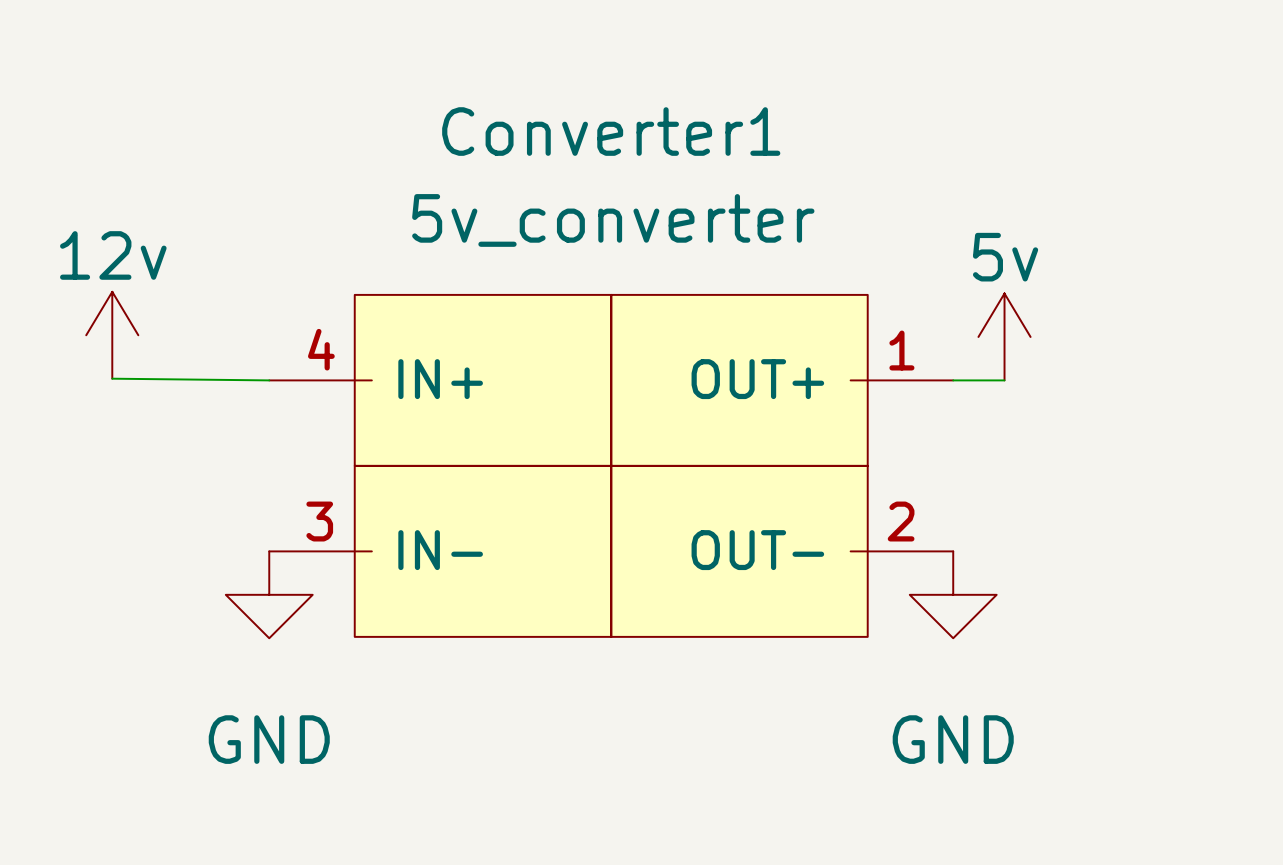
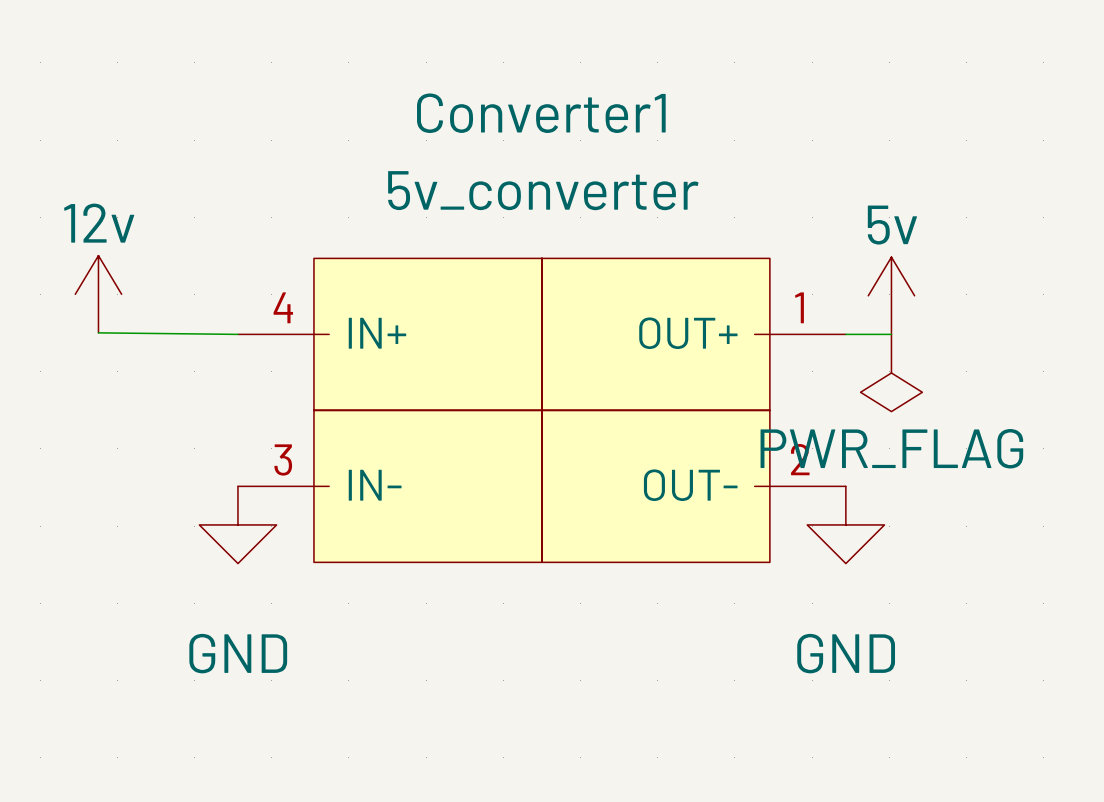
power symbol: none -> PWR_FLAG (891, 372)

